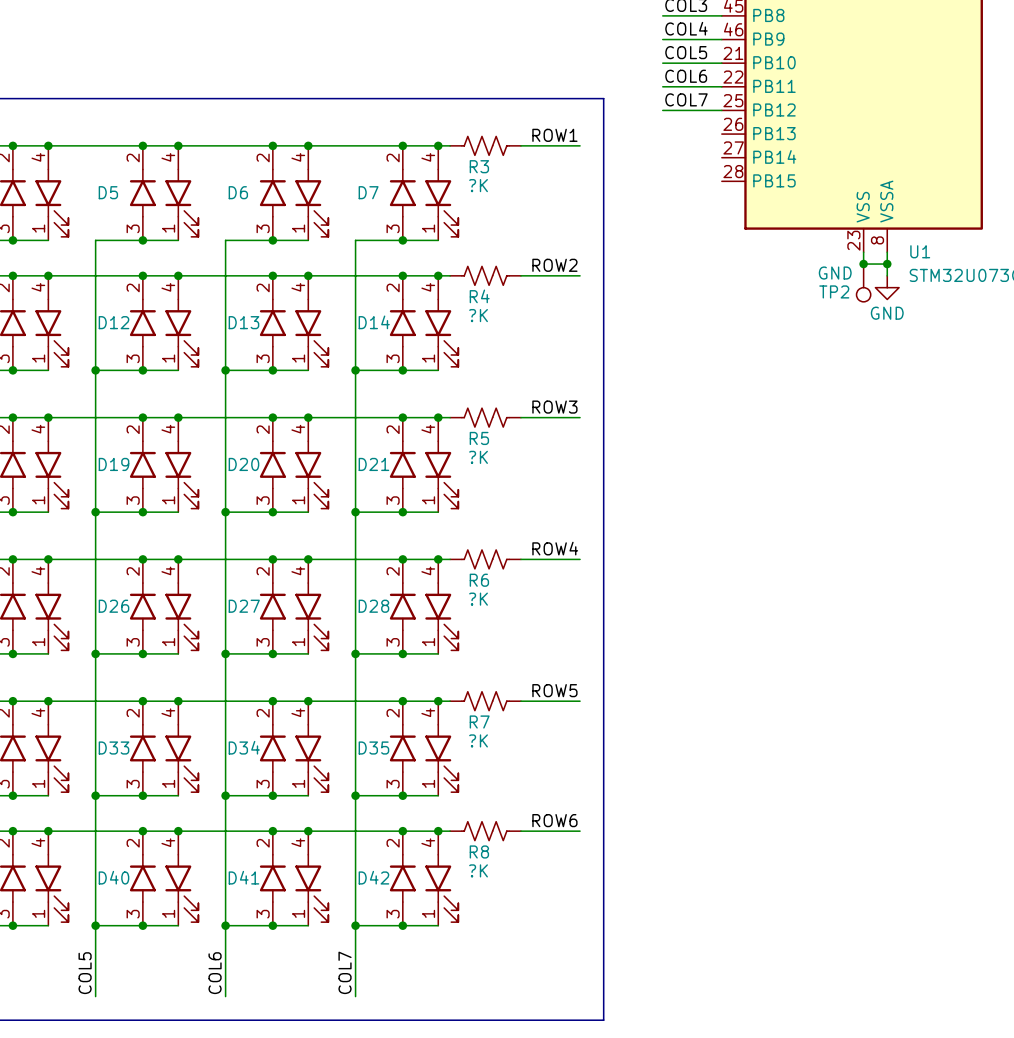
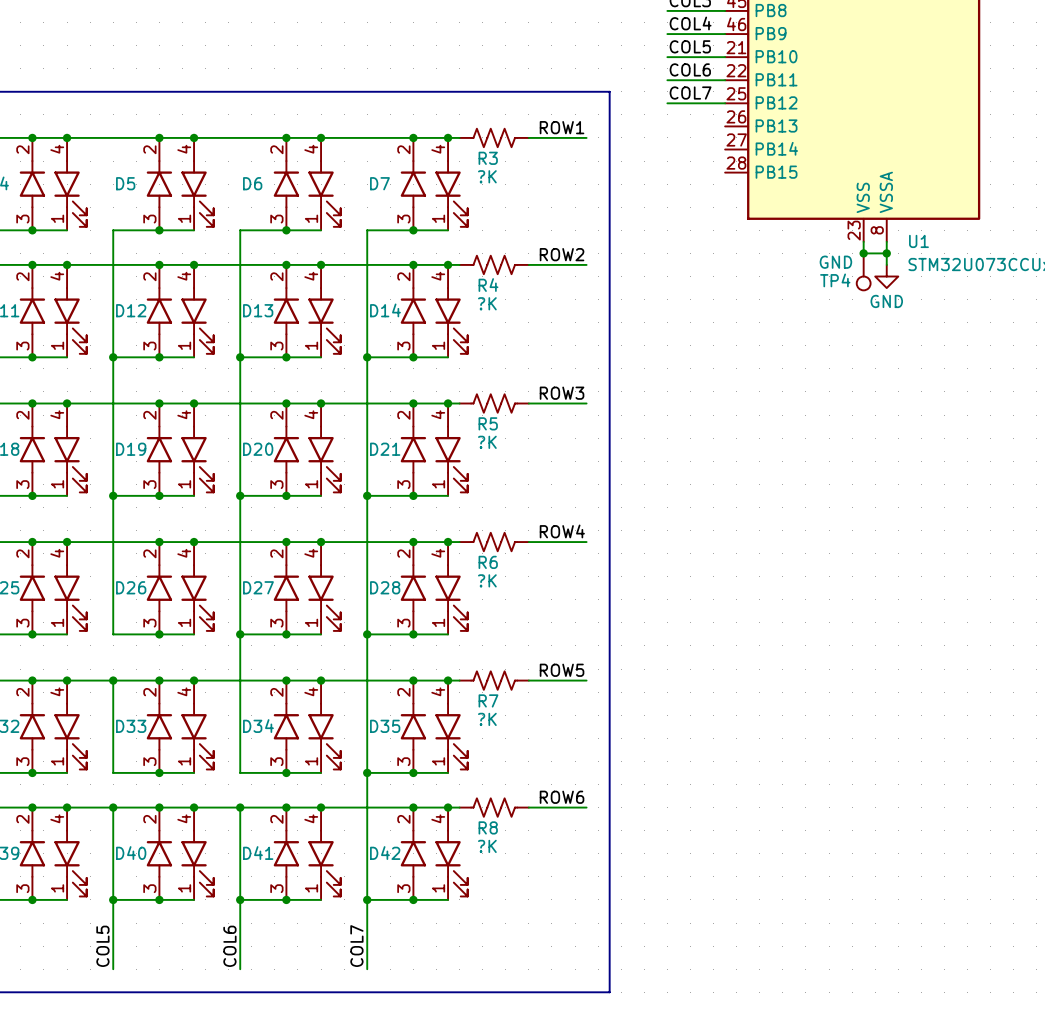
TP2 name: TP2 (834, 291) -> TP4 (835, 280)
wire: (95, 653) (95, 701) -> none
junction: (95, 653) -> none
junction: none -> (113, 680)
wire: (95, 795) (95, 831) -> none
junction position: (95, 795) -> (113, 807)
wire: (225, 795) (225, 831) -> none
junction position: (225, 795) -> (240, 807)

